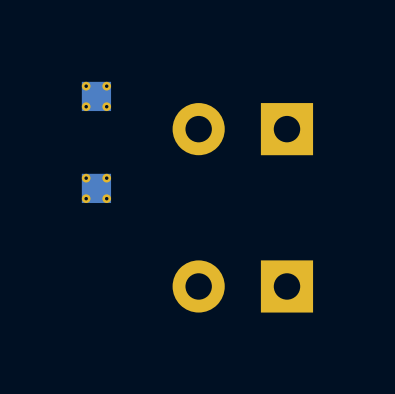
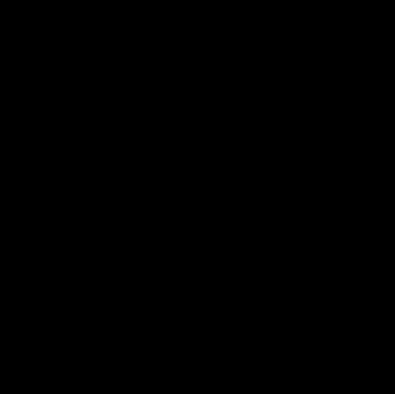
part: (96, 96) -> none
part: (242, 129) -> none
part: (96, 188) -> none
part: (242, 286) -> none

